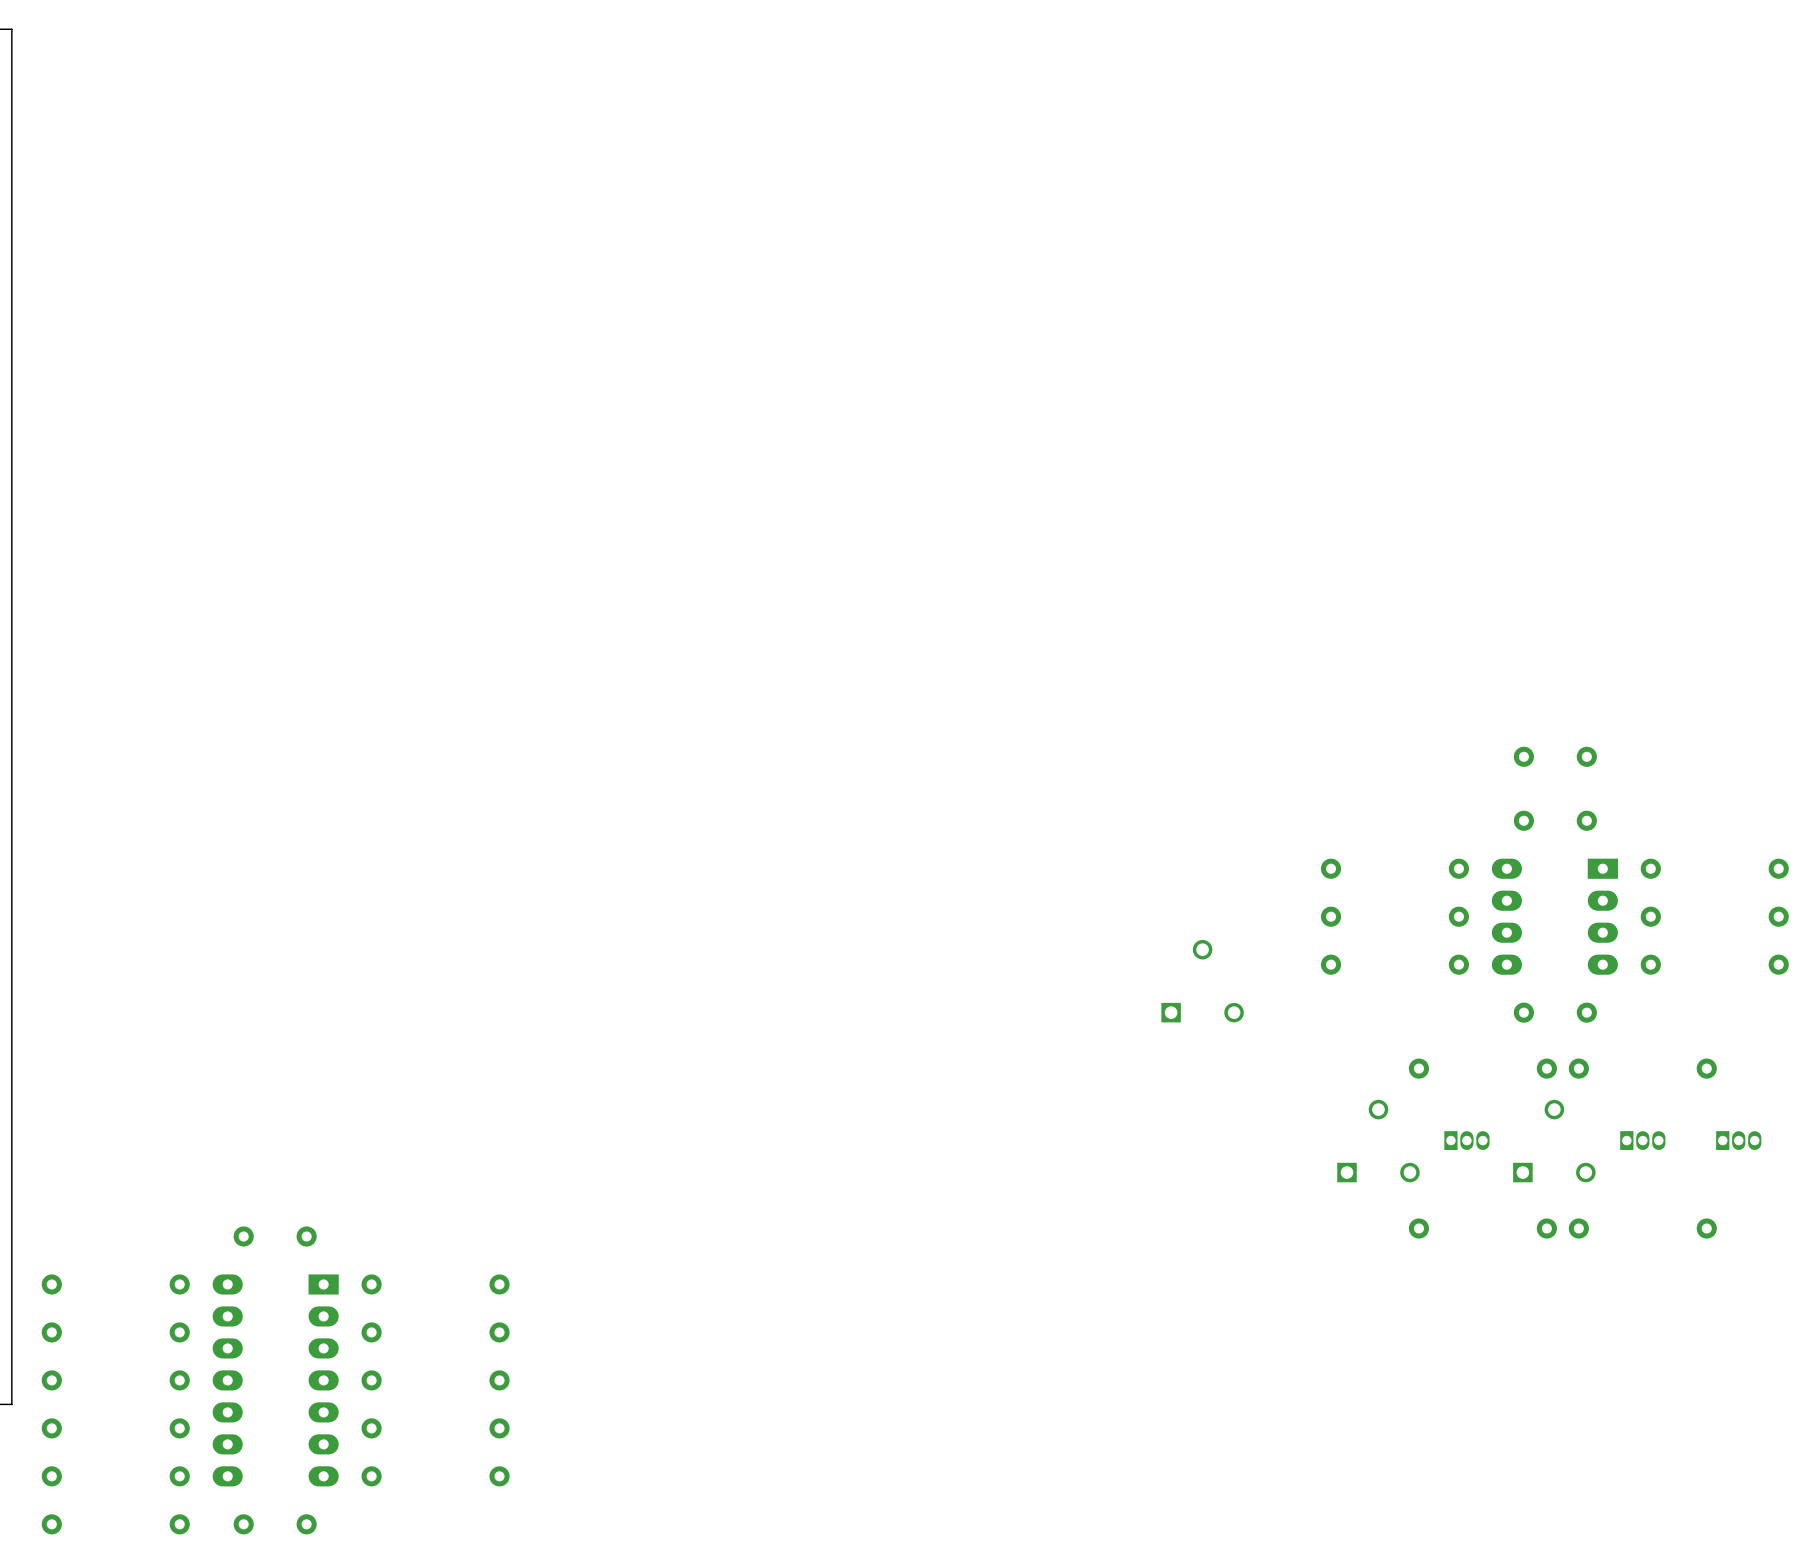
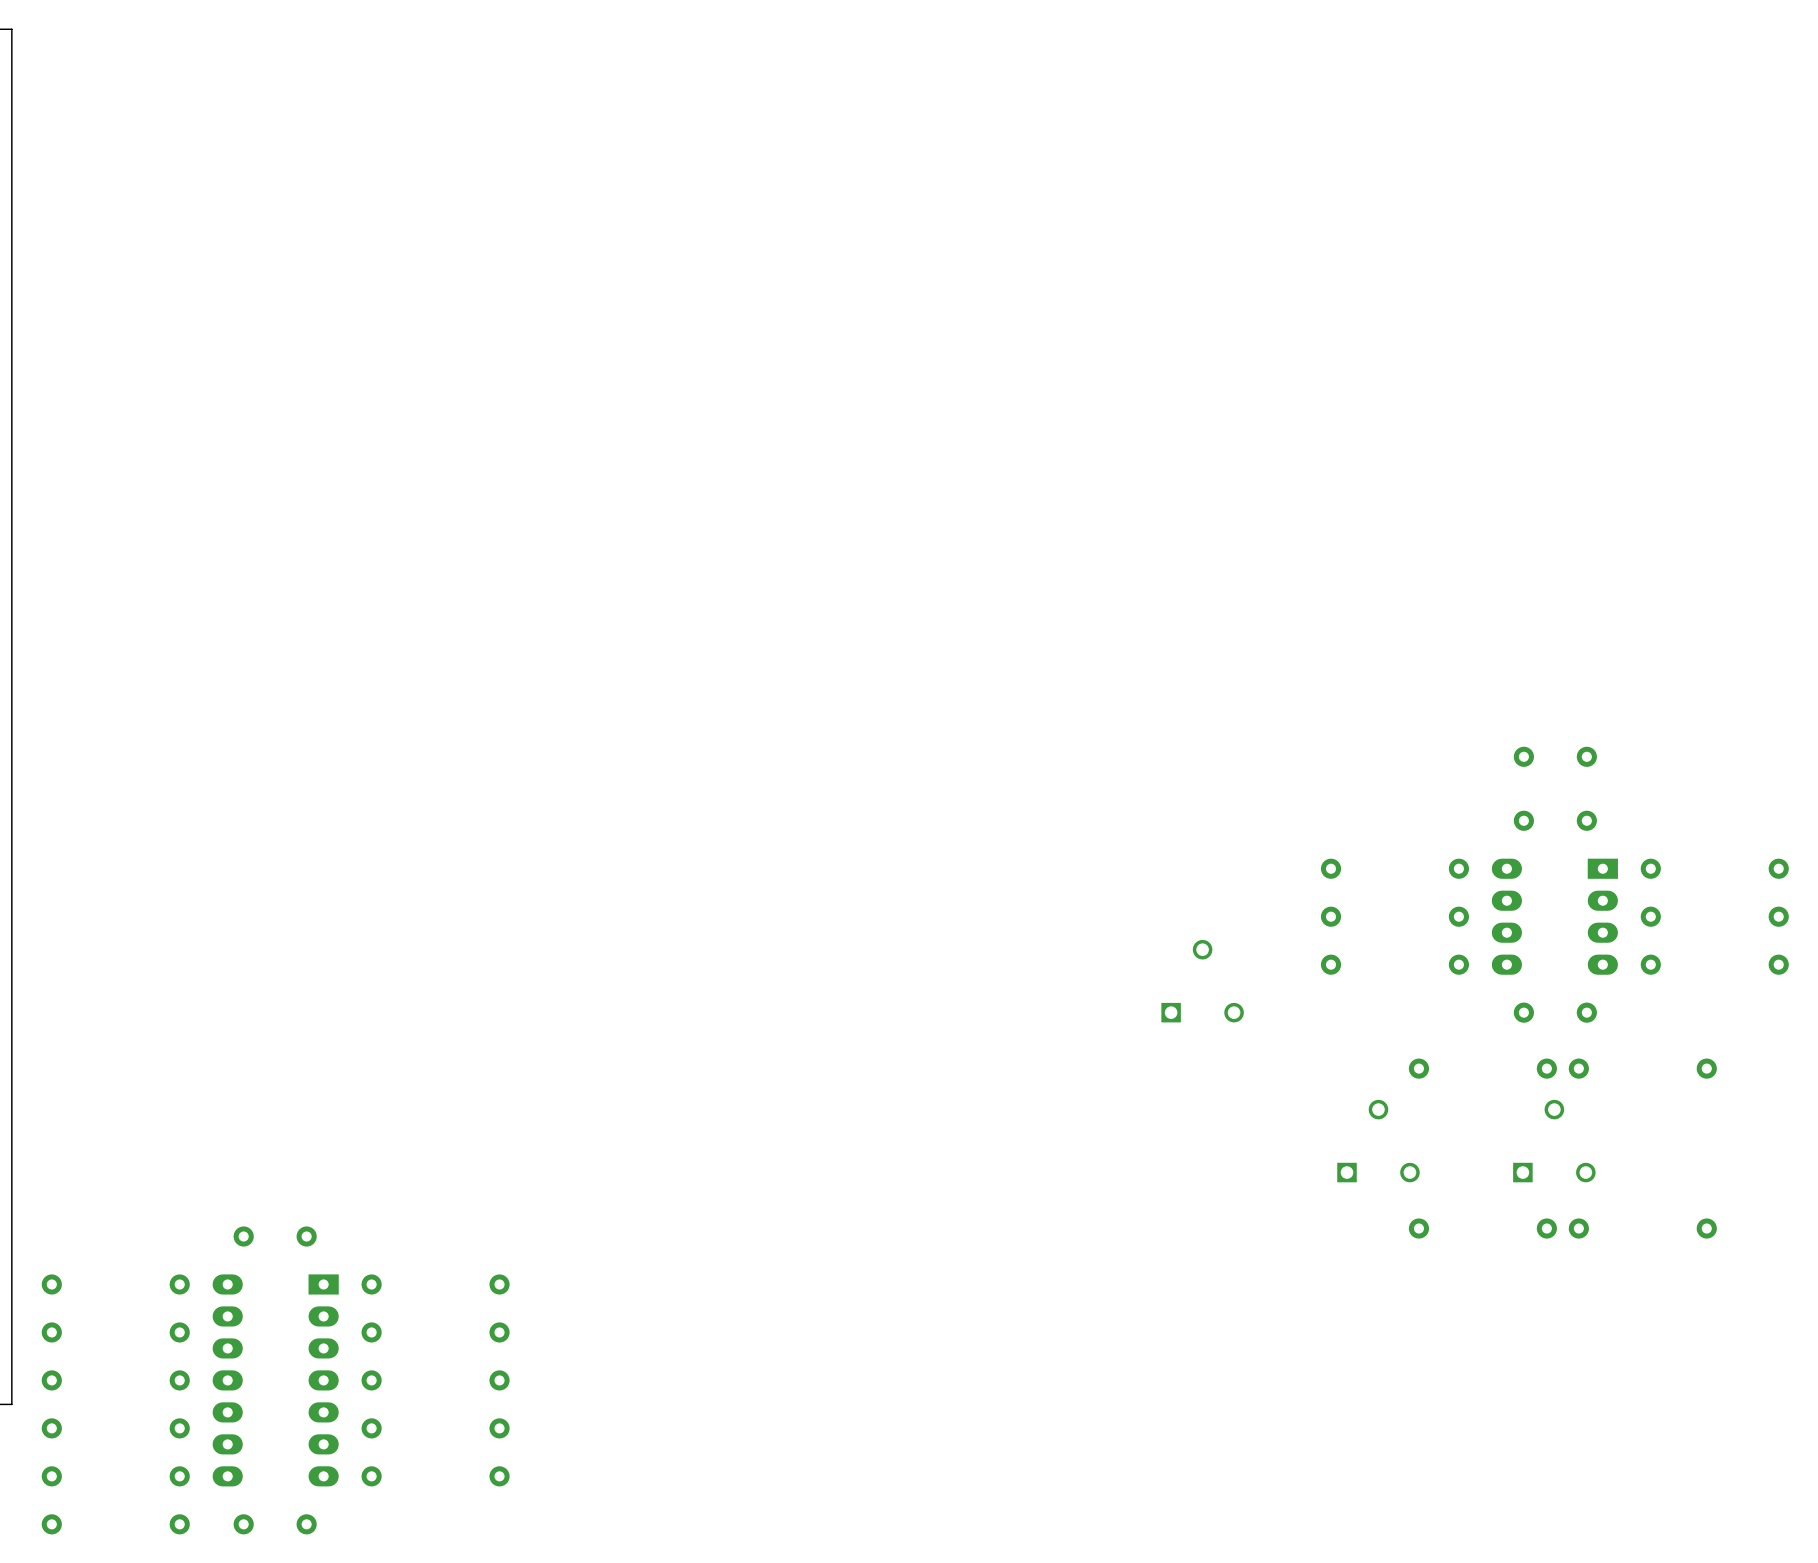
part: (1466, 1140) -> none
part: (1642, 1140) -> none
part: (1738, 1140) -> none

